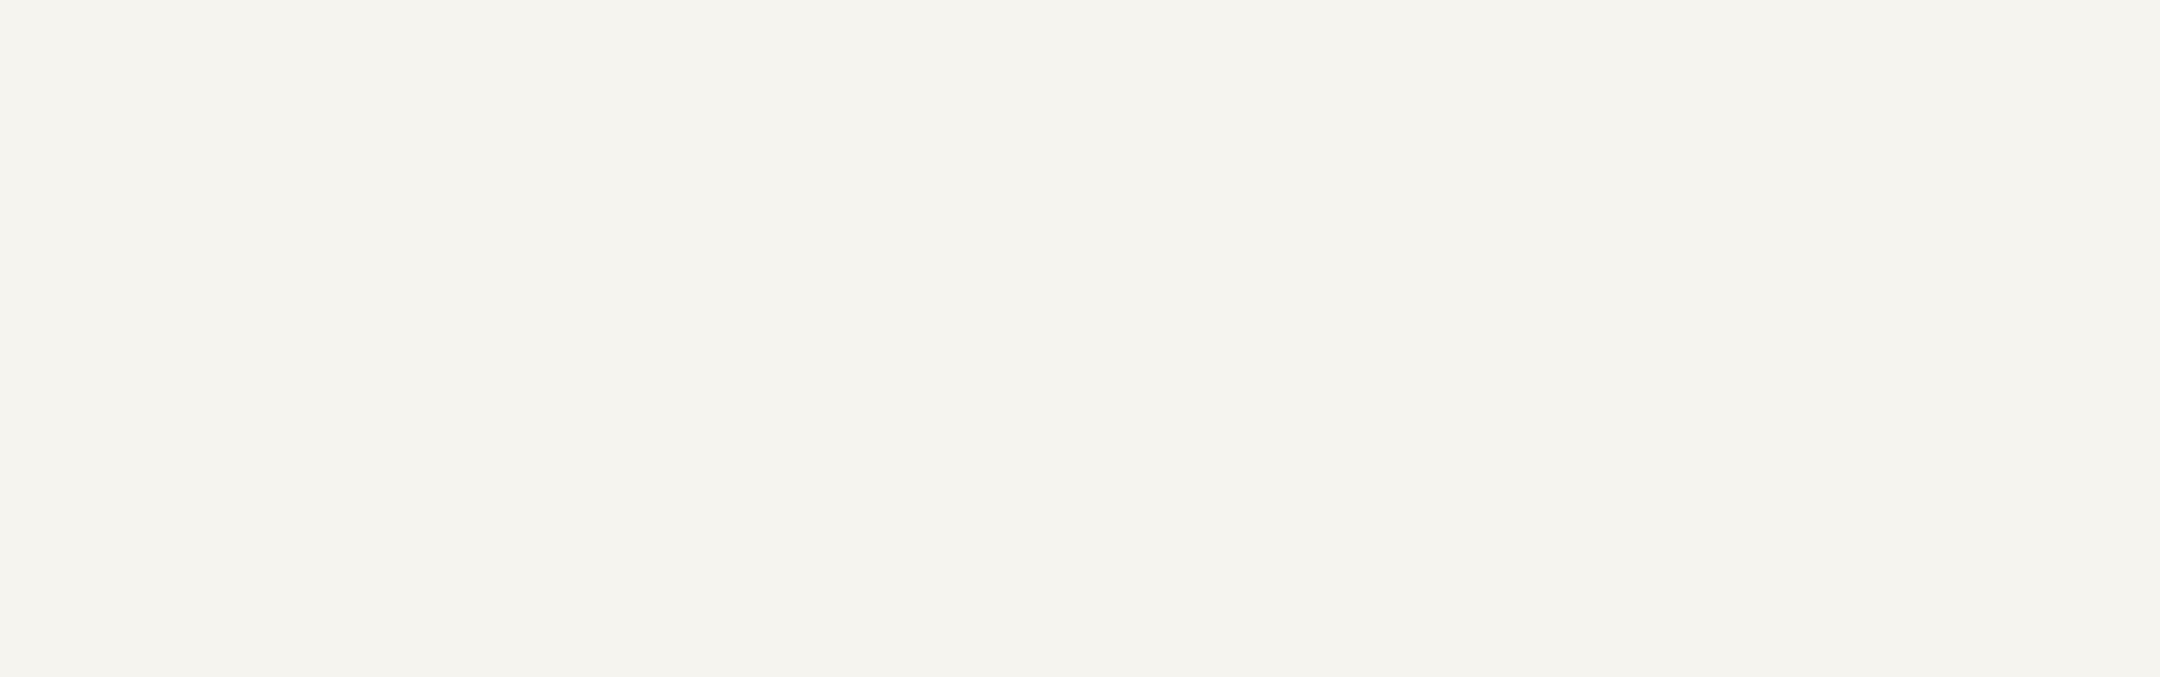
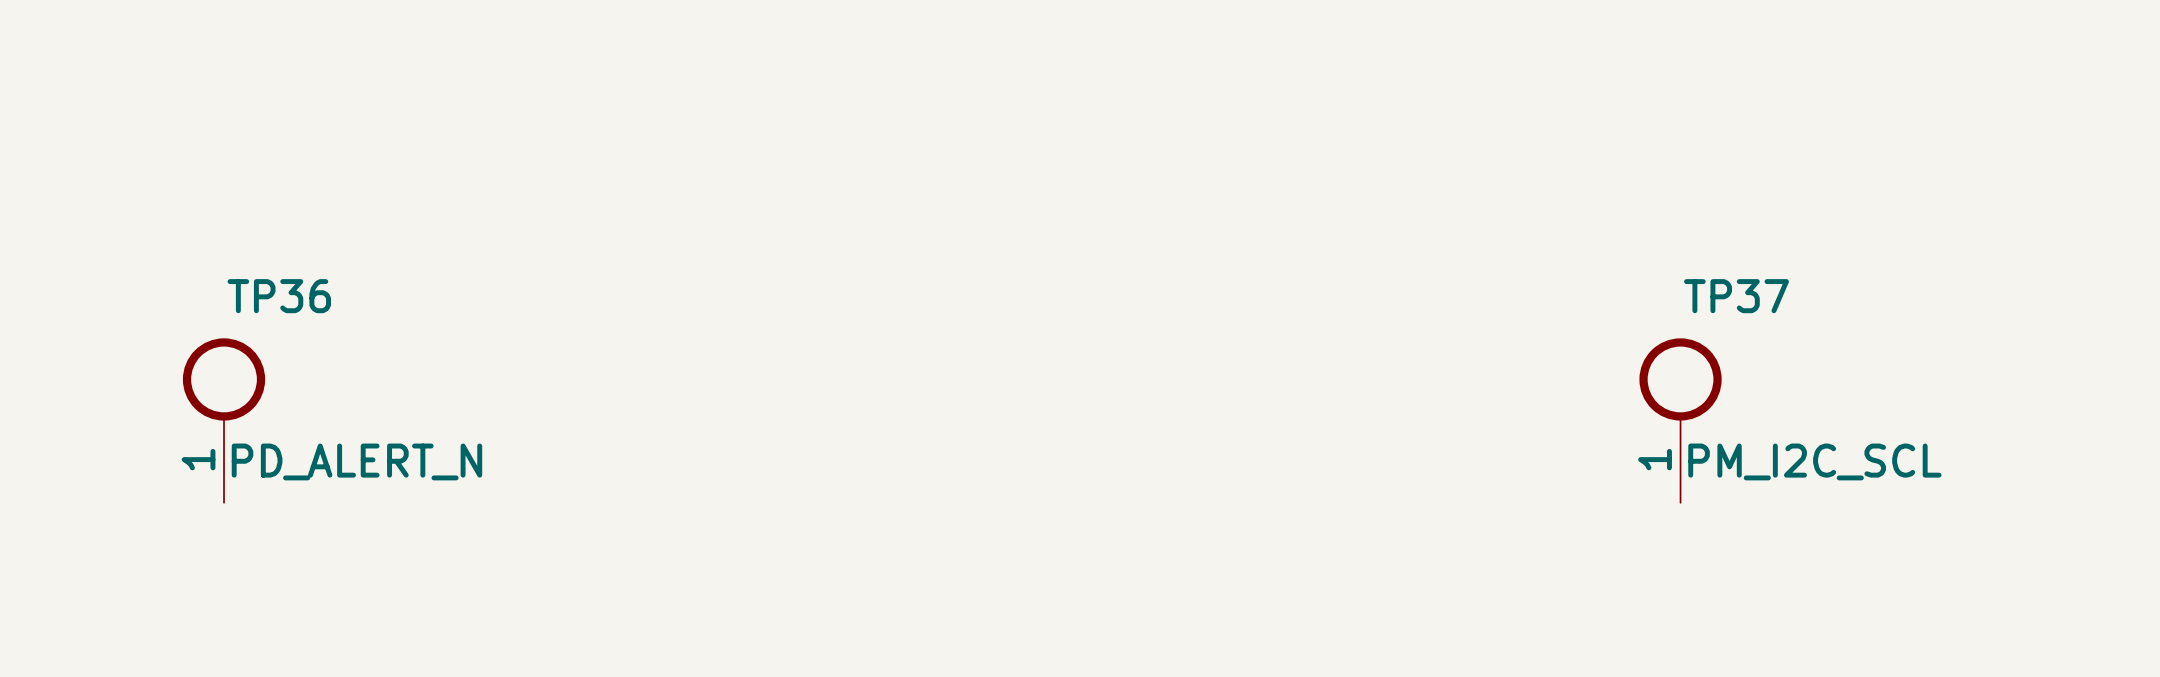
TP36: none -> PD_ALERT_N (224, 420)
TP37: none -> PM_I2C_SCL (1680, 420)

